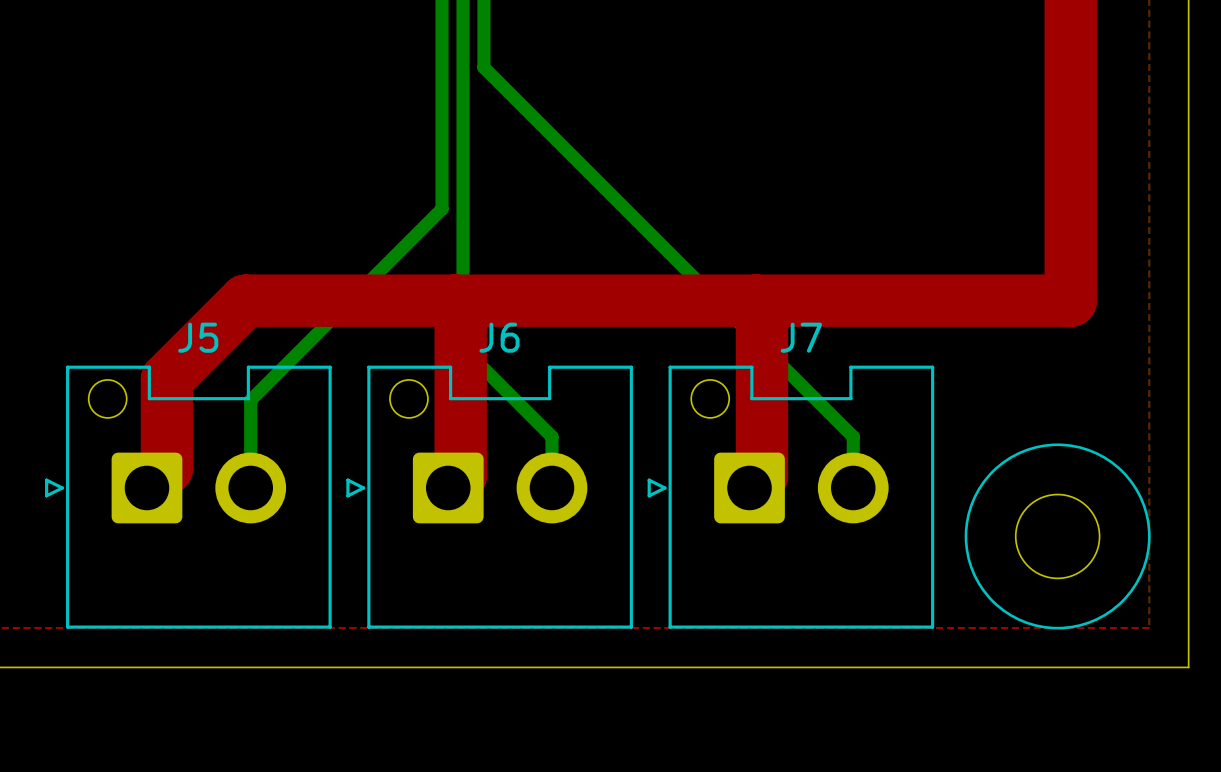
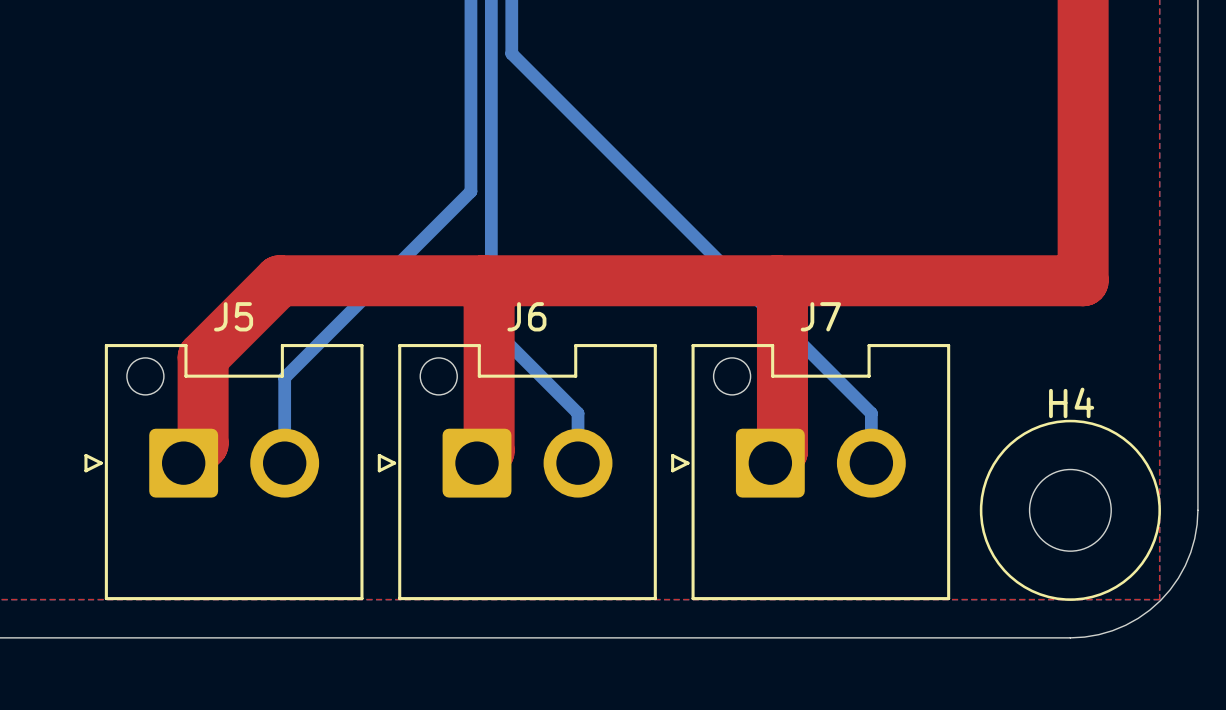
H4 name: none -> H4 (1071, 402)
board edge: (1188, 536) (1188, 667) (1057, 667) -> (1197, 510) (1194, 538) (1185, 565) (1170, 589) (1160, 600) (1138, 618) (1125, 625) (1098, 634) (1070, 637)

